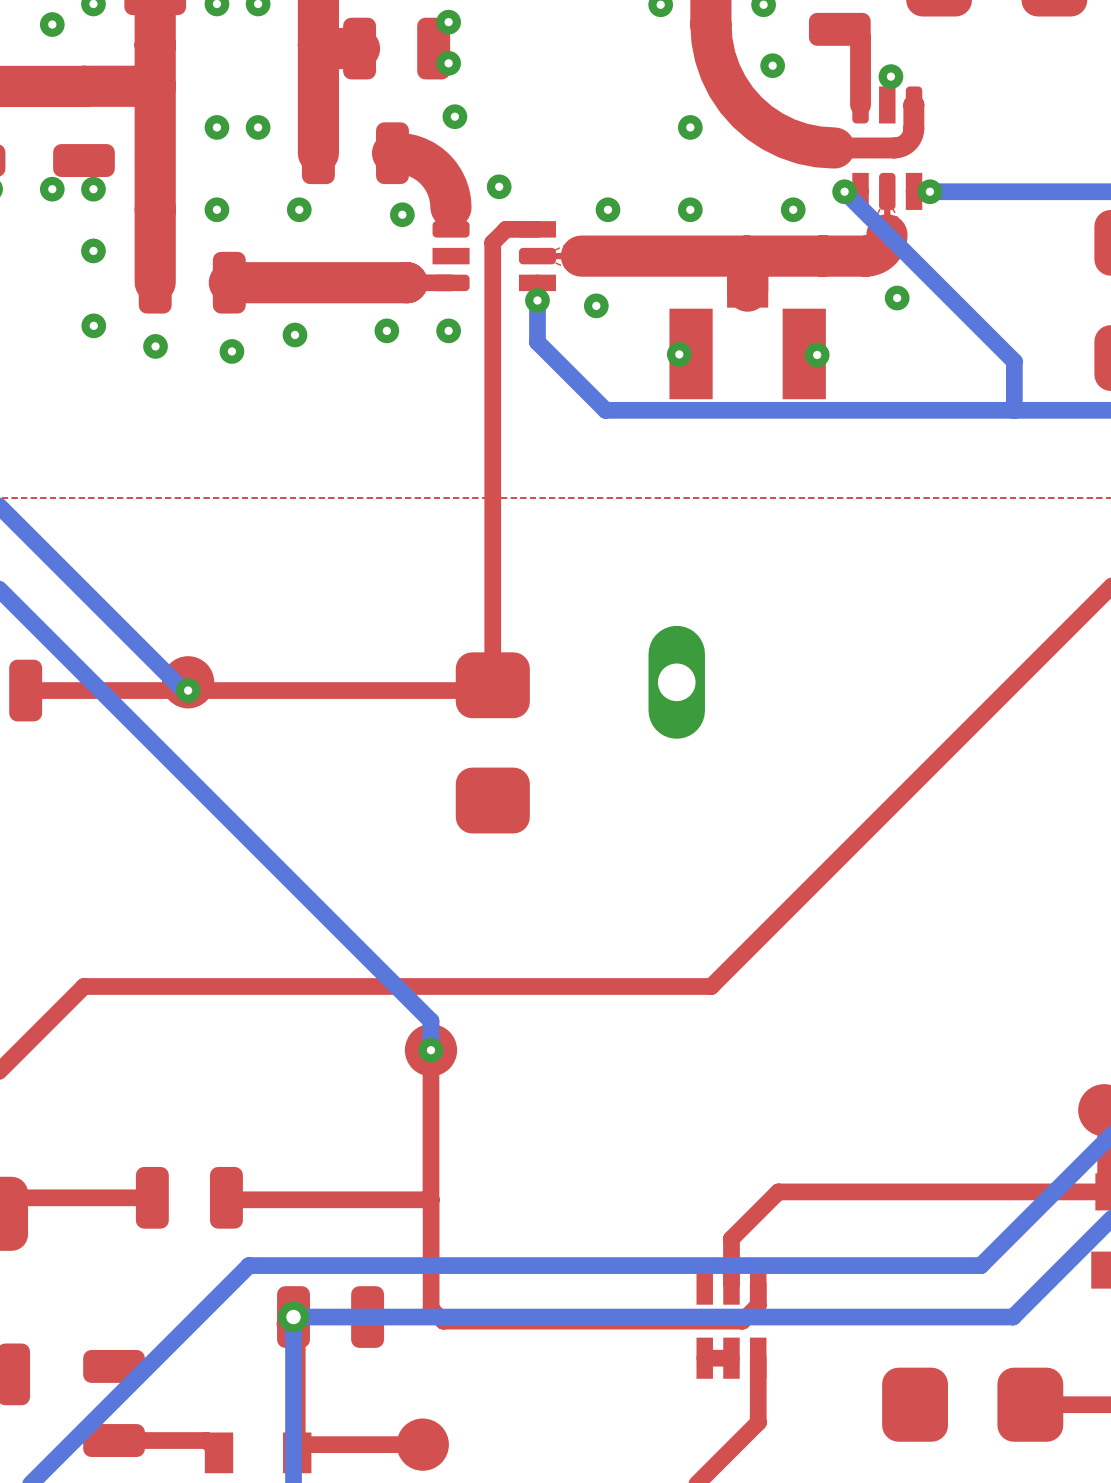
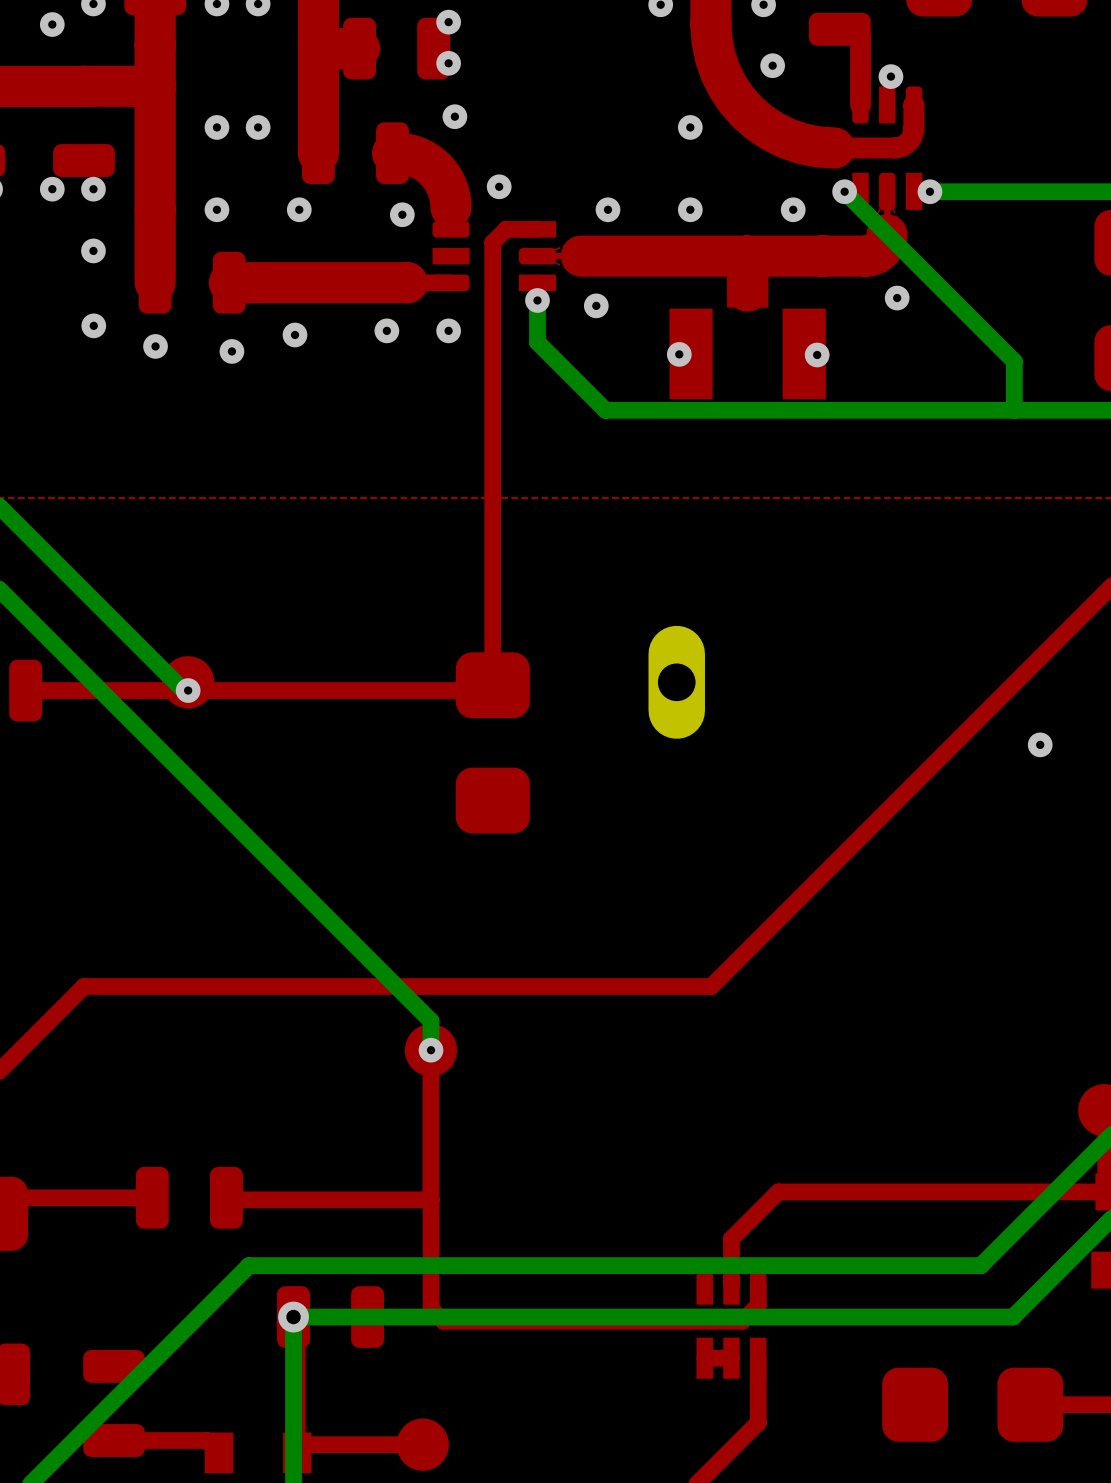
via: none -> (1040, 744)

